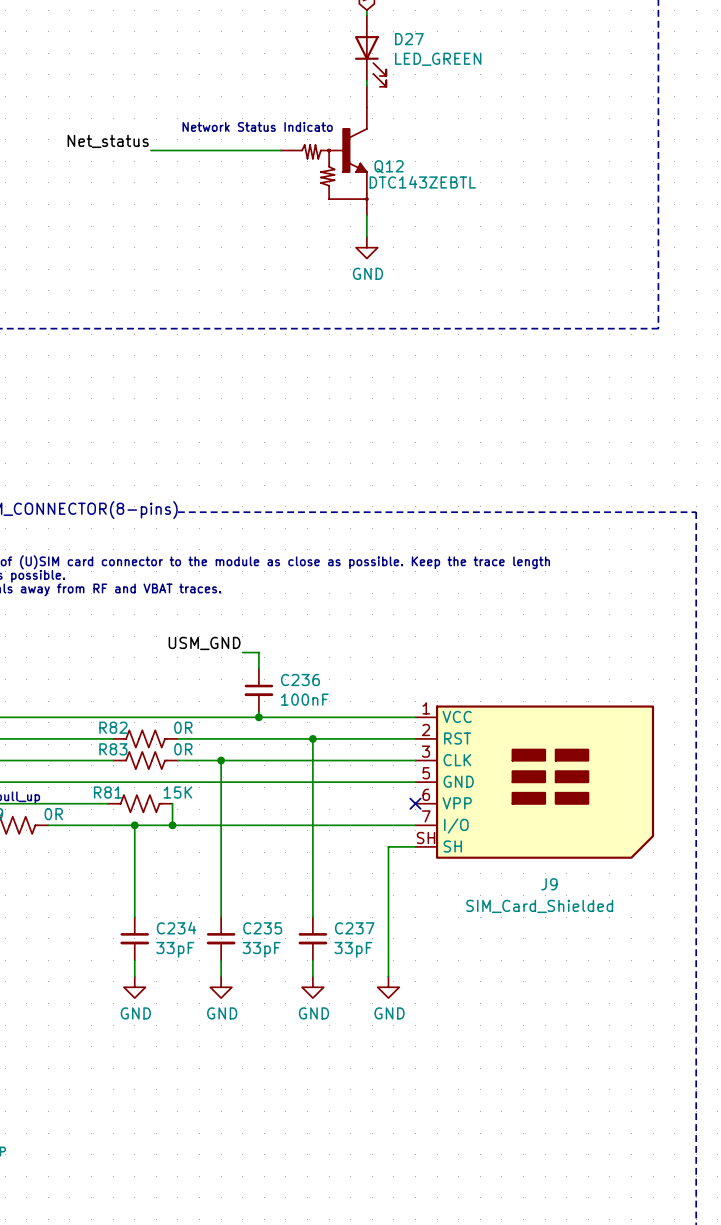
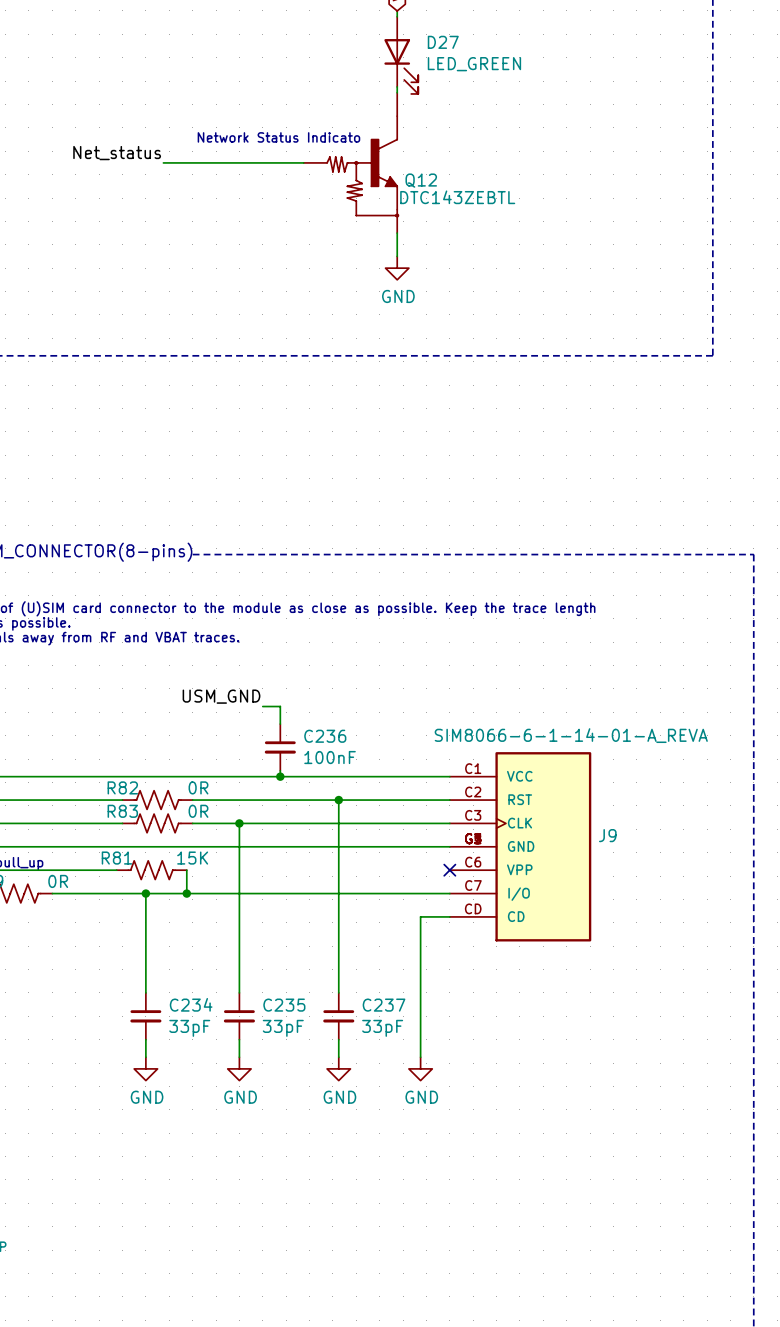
J9 symbol: [415, 705, 655, 859] -> [449, 752, 592, 942]
J9 name position: J9 (549, 884) -> J9 (607, 835)
J9 value: SIM_Card_Shielded (539, 906) -> SIM8066-6-1-14-01-A_REVA (571, 735)

